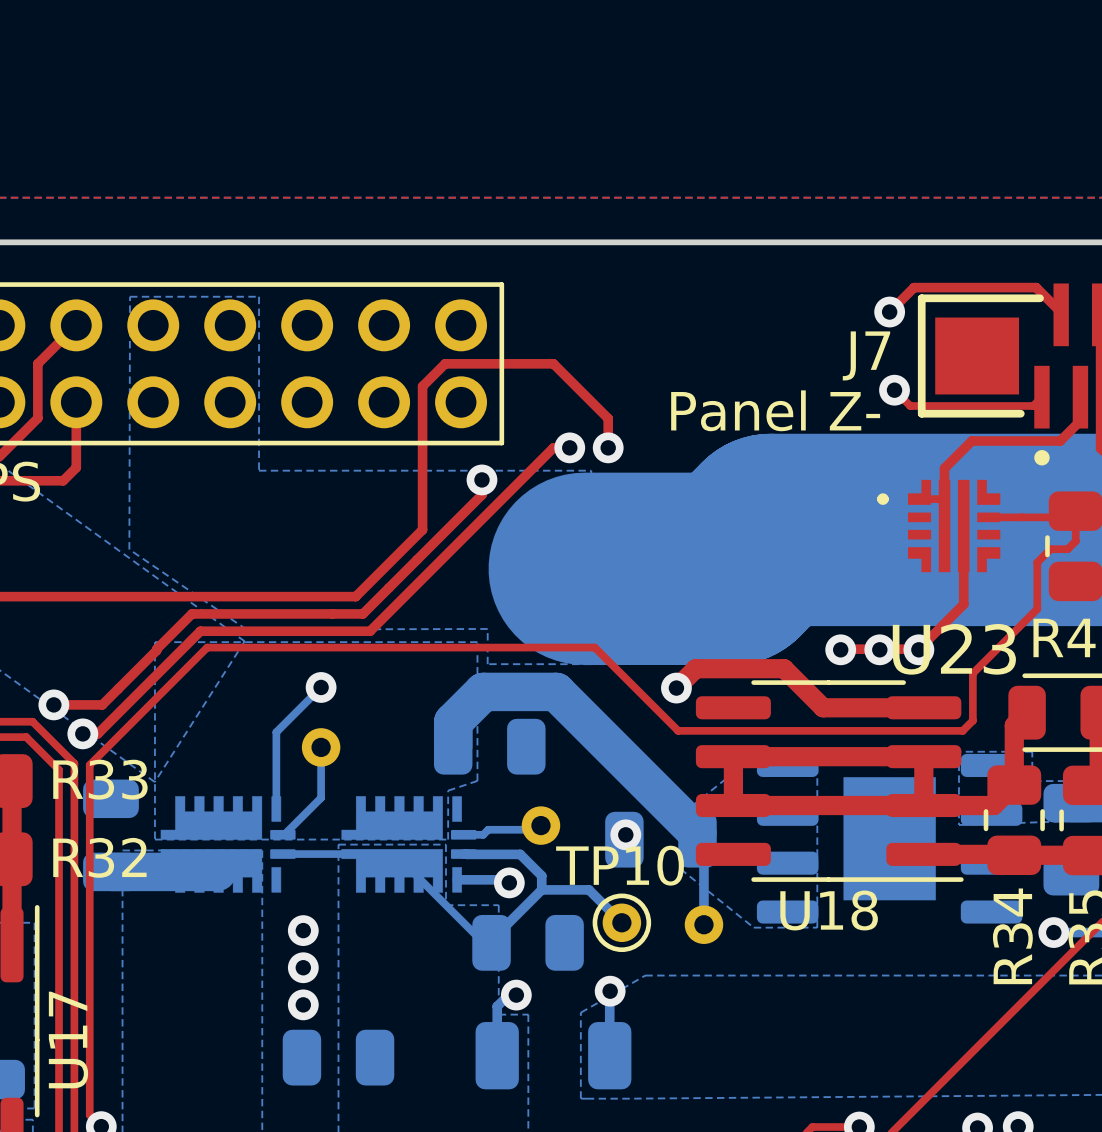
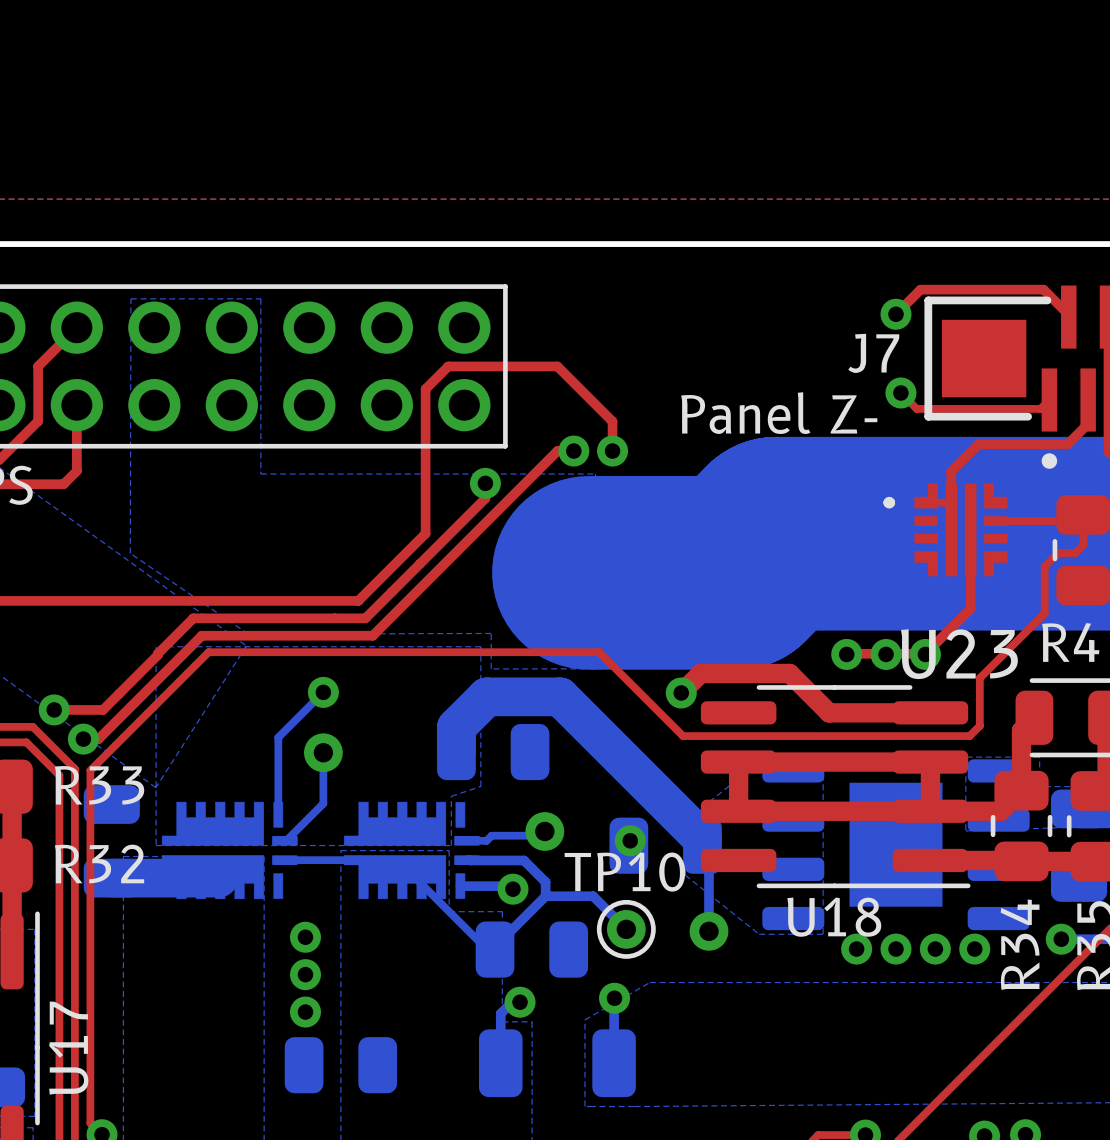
via: none -> (856, 949)
via: none -> (896, 949)
via: none -> (935, 949)
via: none -> (974, 949)

